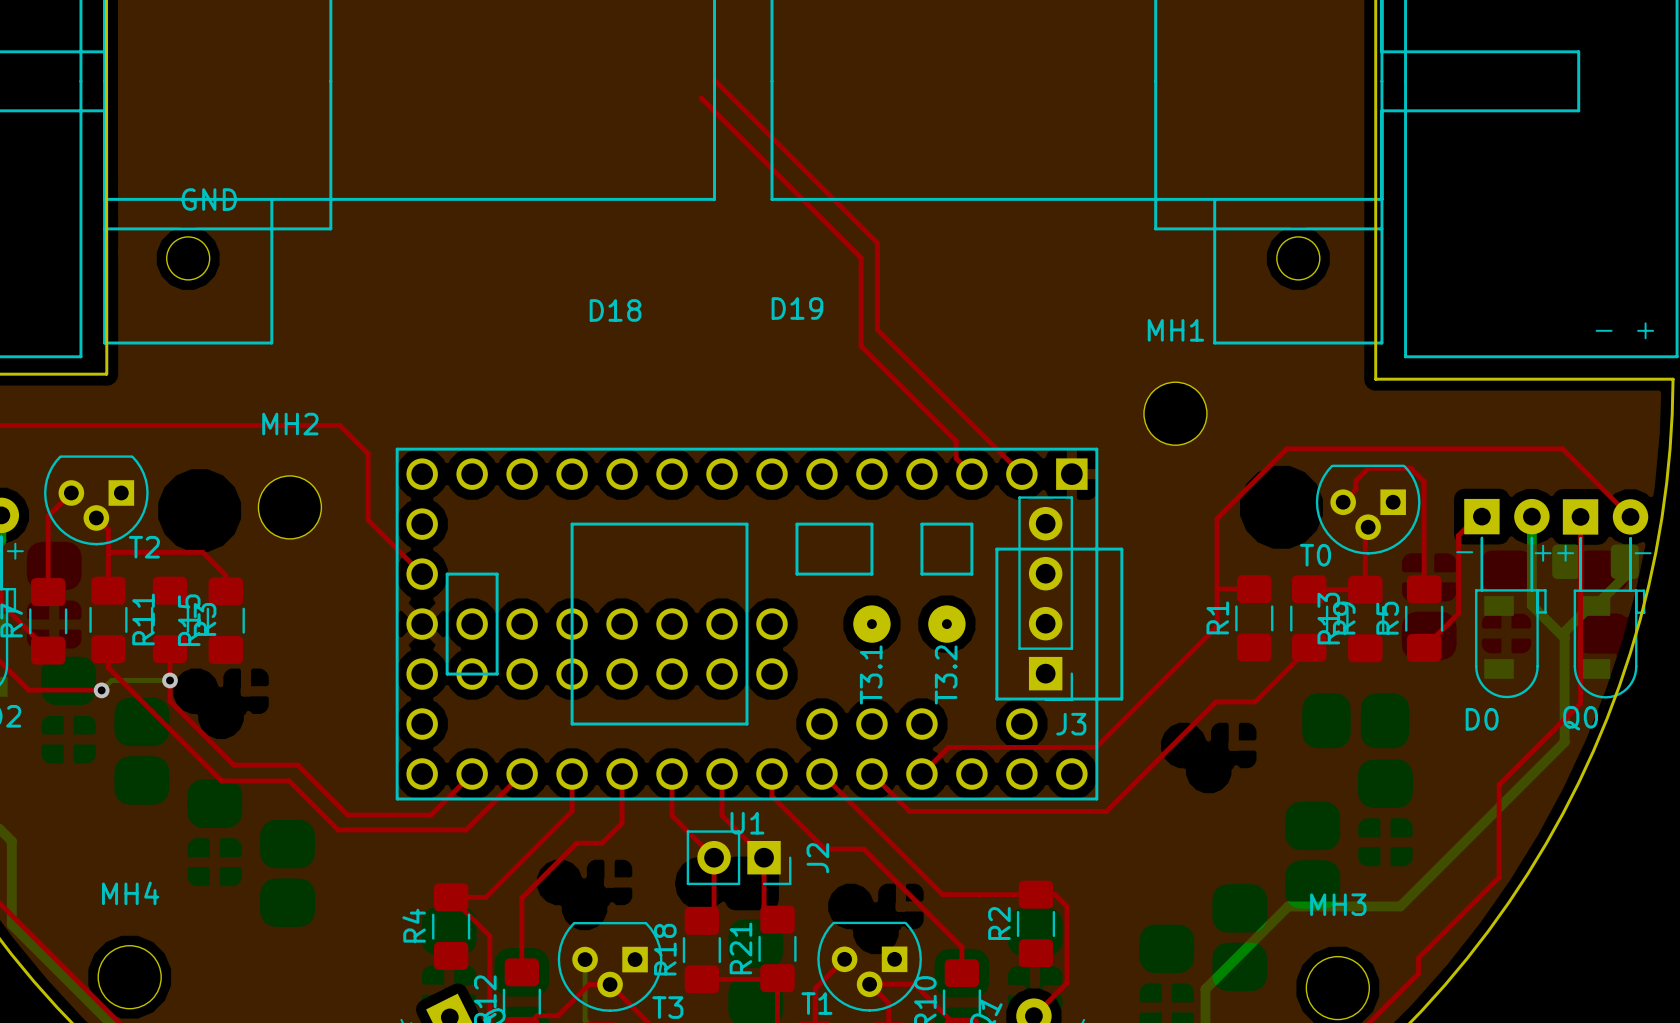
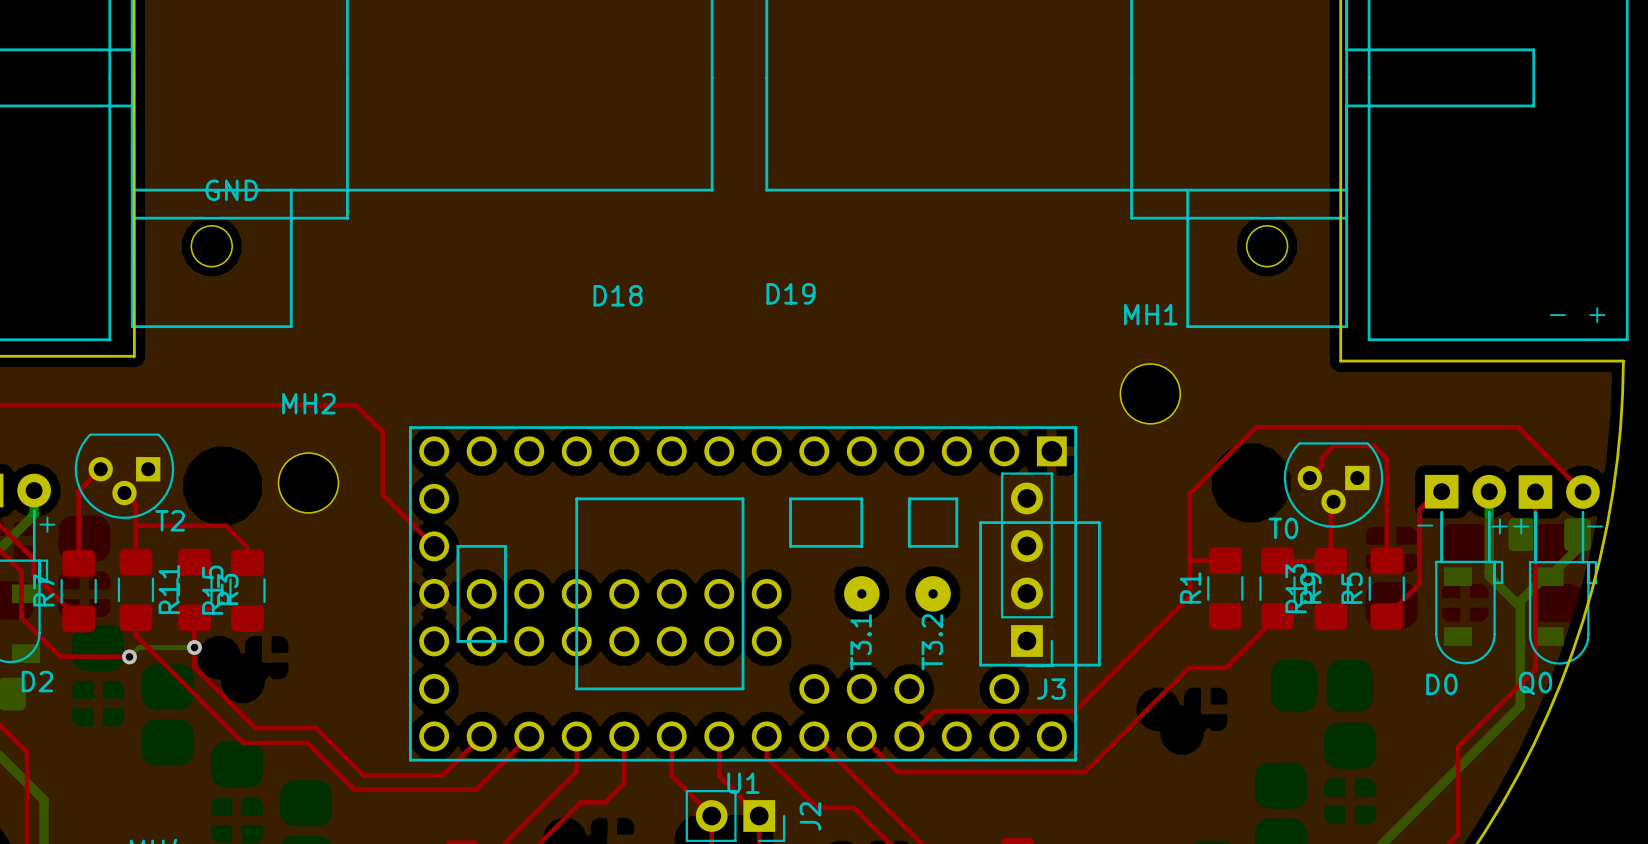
top track: (714, 80) (877, 242) (877, 329) (1021, 474) -> none
top track: (701, 97) (861, 257) (861, 345) (956, 441) (956, 458) (971, 474) -> none

